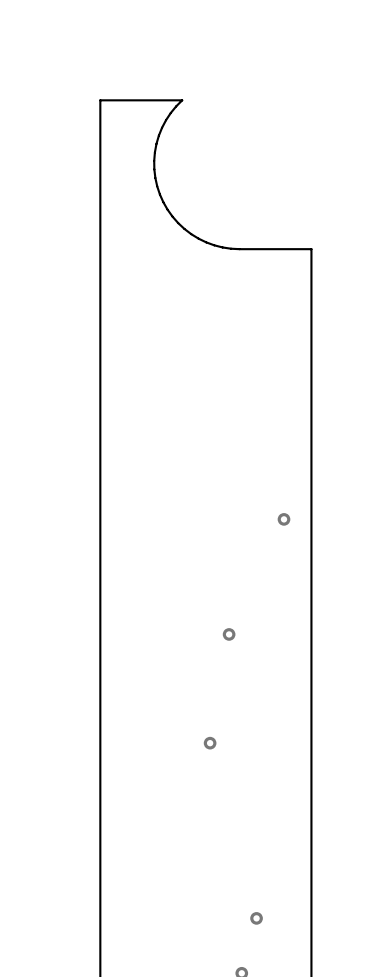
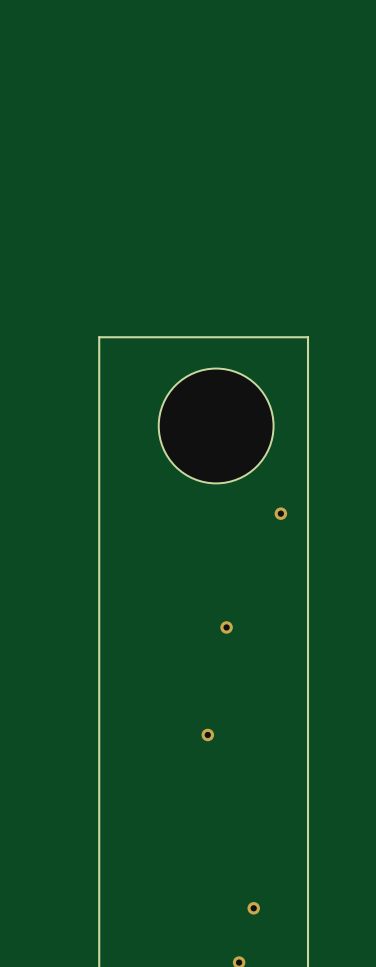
board edge: (311, 341) (311, 249) (239, 249) (214, 245) (198, 238) (184, 228) (172, 216) (163, 202) (155, 177) (154, 152) (162, 127) (170, 113) (182, 100) (100, 100) (100, 341) -> (308, 337) (99, 337)
part: none -> (216, 425)

